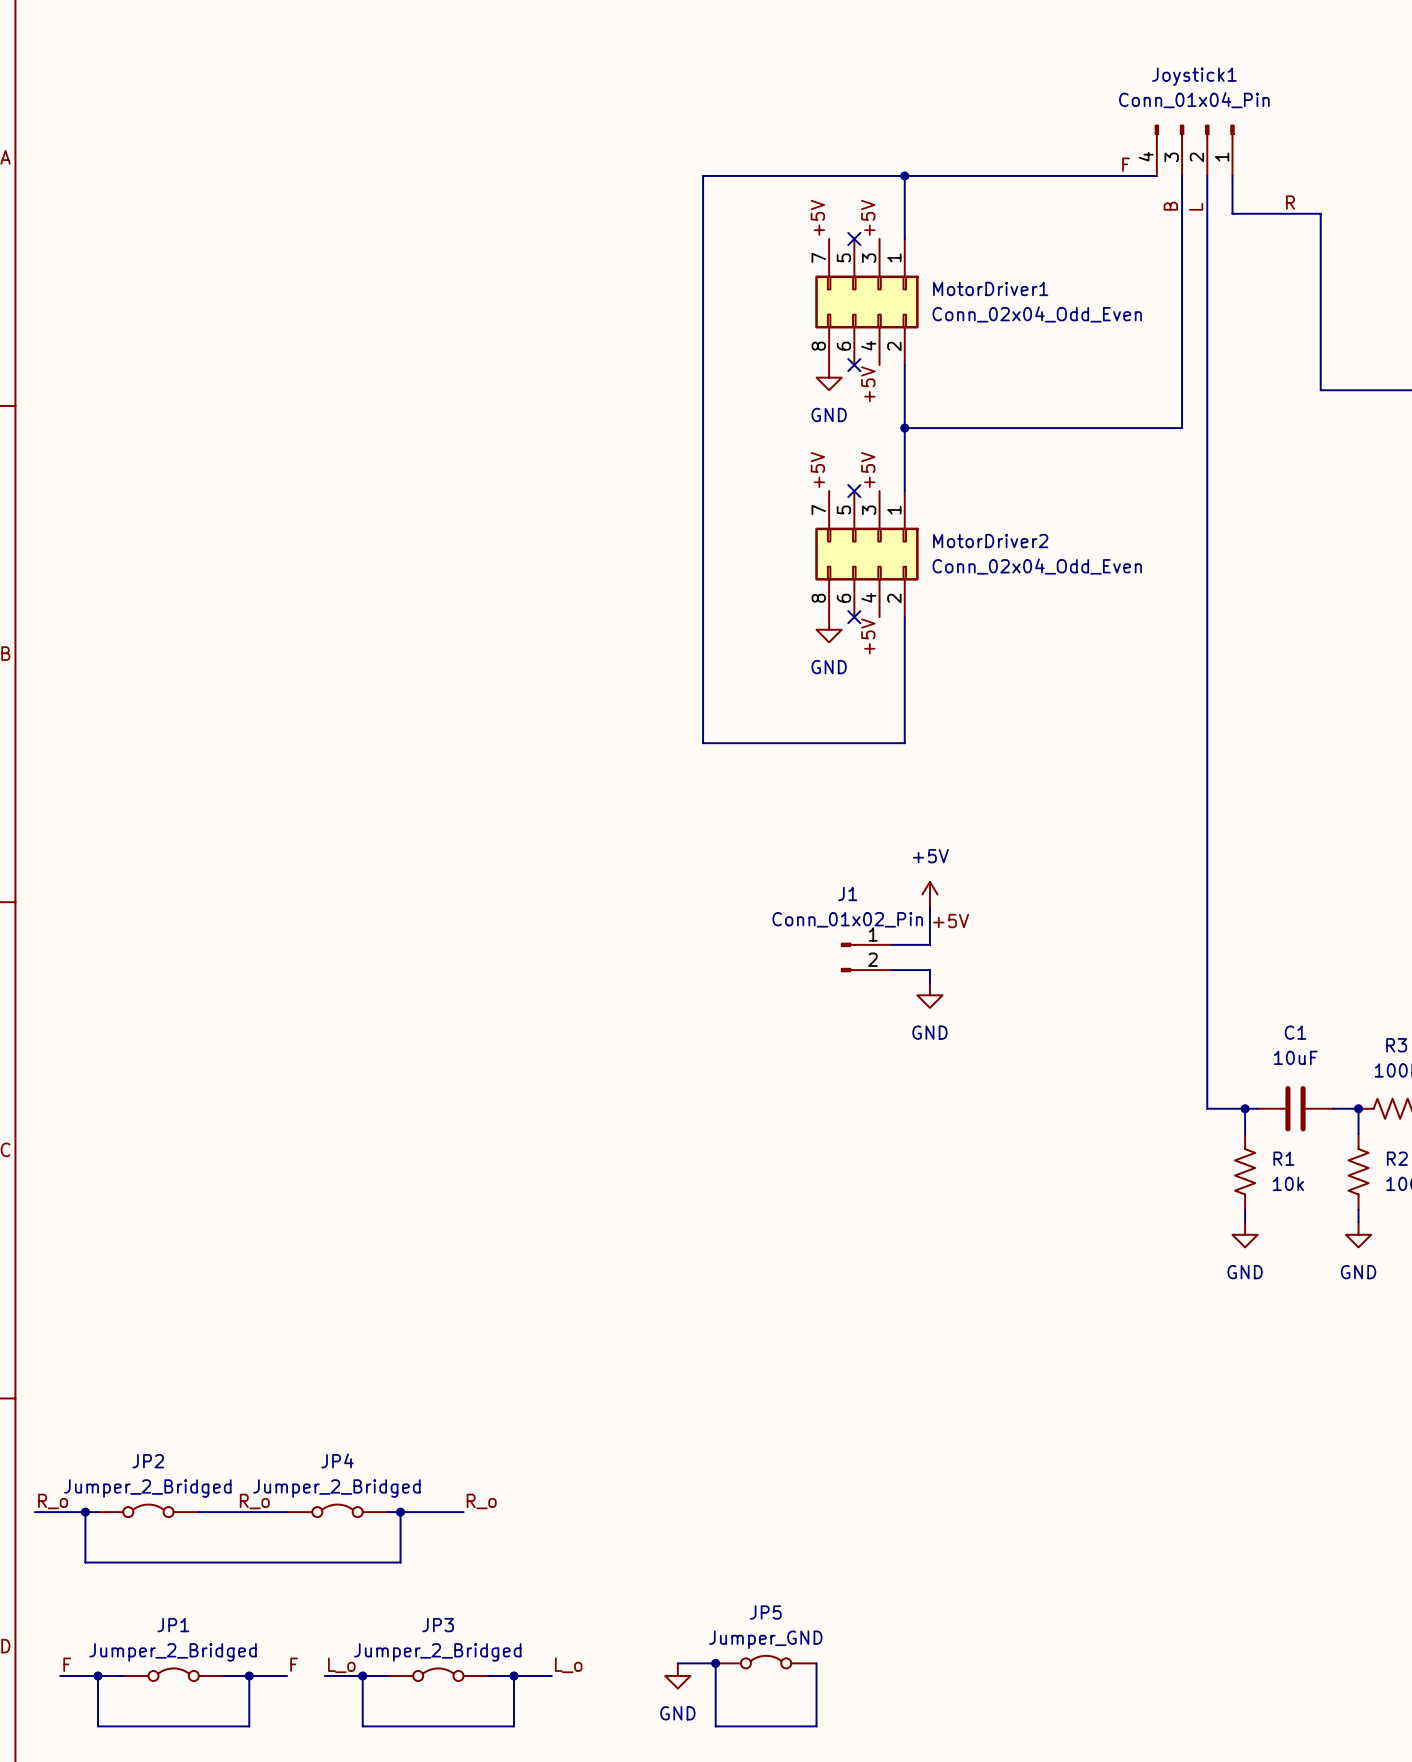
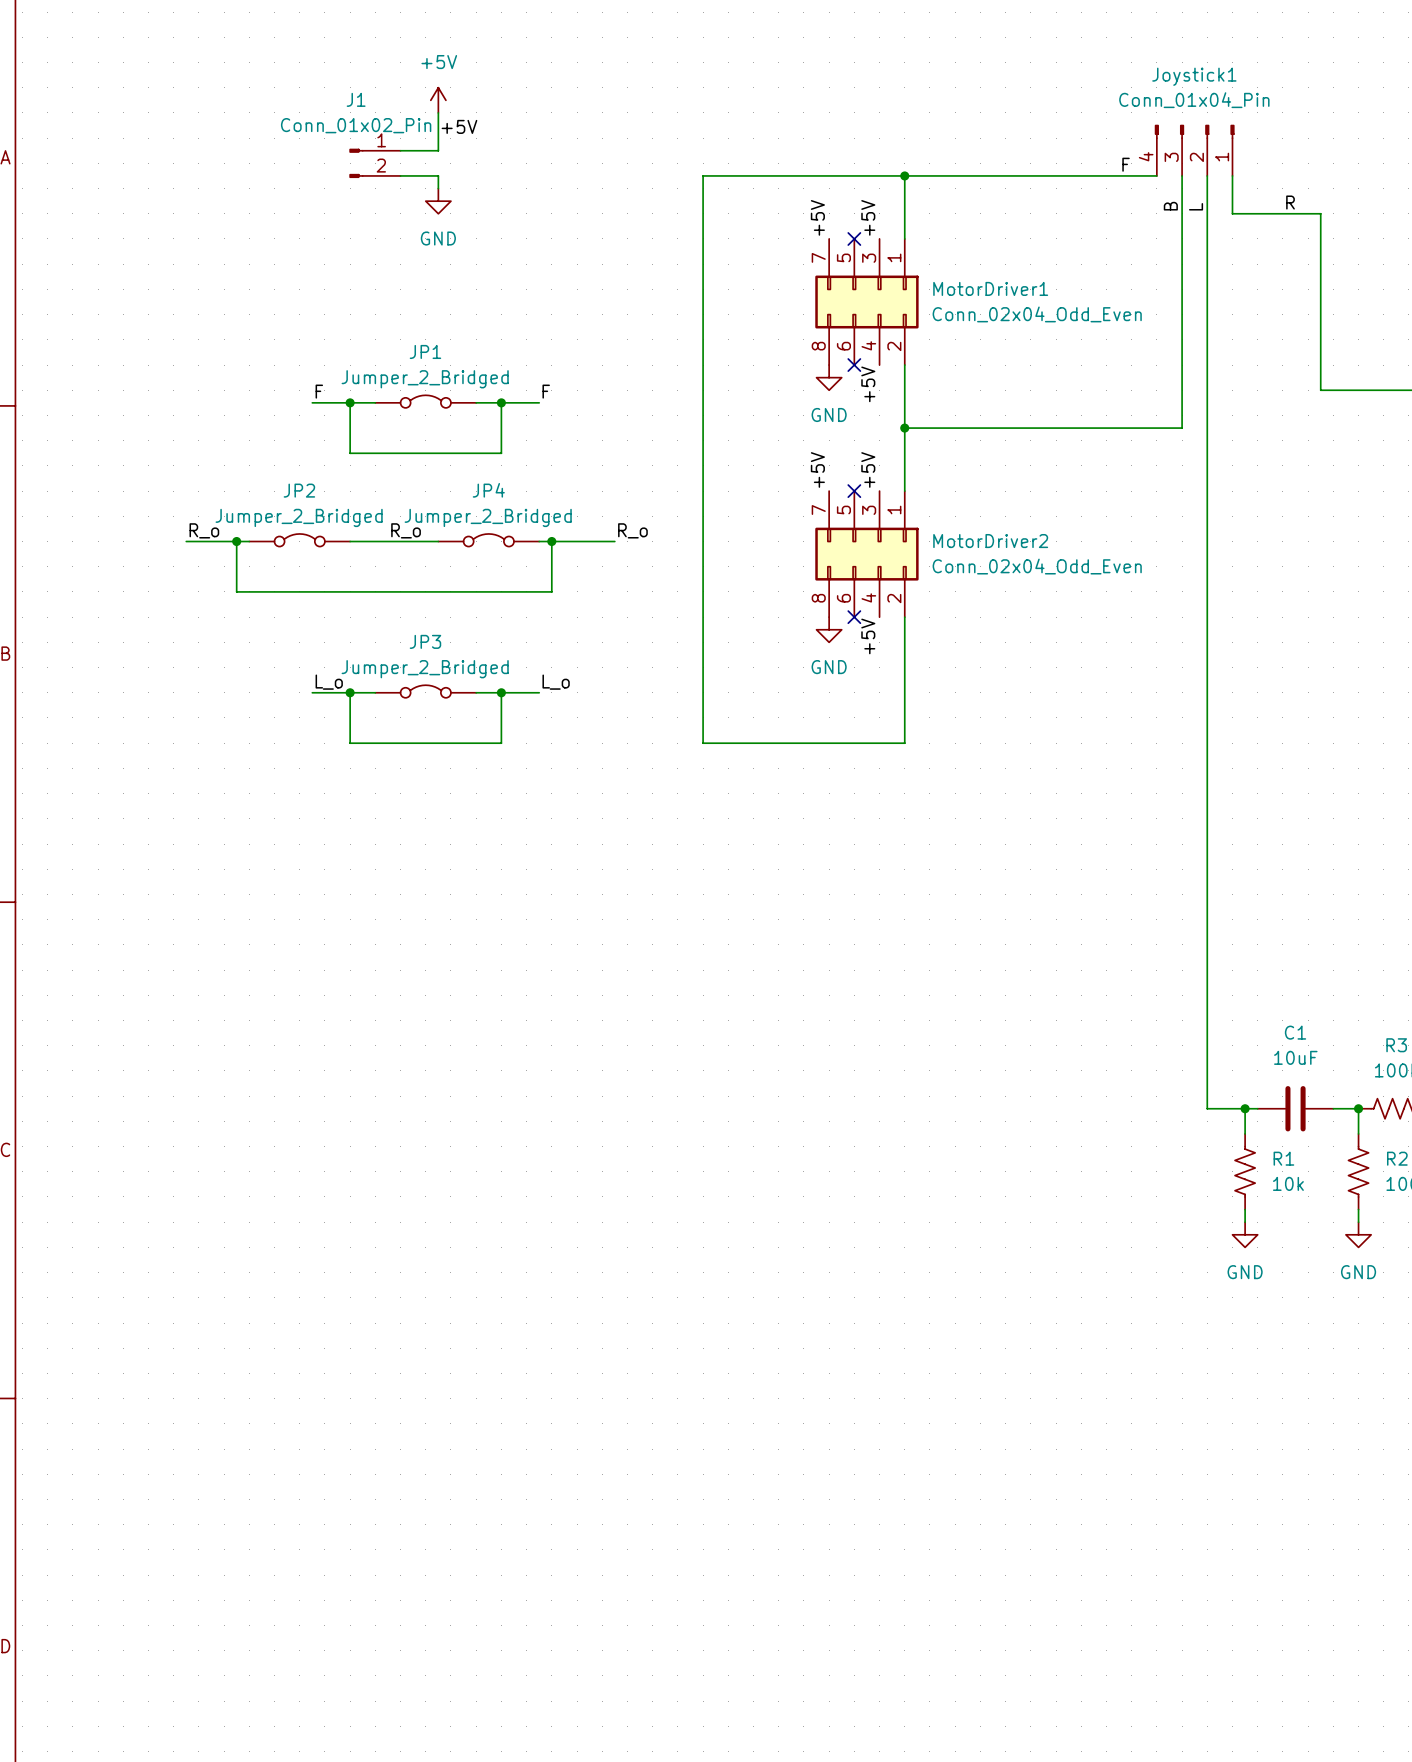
power symbol: none -> +5V (438, 100)
wire: none -> (438, 112) (438, 150) (400, 150)
label: none -> +5V (459, 126)
wire: none -> (400, 175) (438, 175) (438, 188)
power symbol: none -> GND (438, 201)
label: none -> F (319, 391)
label: none -> F (546, 391)
wire: none -> (312, 402) (375, 402)
wire: none -> (350, 402) (350, 453) (501, 453) (501, 402)
junction: none -> (350, 402)
wire: none -> (476, 402) (539, 402)
junction: none -> (501, 402)
label: none -> R_o (204, 530)
label: none -> R_o (406, 530)
label: none -> R_o (632, 530)
wire: none -> (186, 541) (249, 541)
wire: none -> (236, 541) (236, 591) (551, 591) (551, 541)
junction: none -> (236, 541)
wire: none -> (350, 541) (438, 541)
wire: none -> (539, 541) (614, 541)
junction: none -> (551, 541)
label: none -> L_o (329, 682)
label: none -> L_o (556, 682)
wire: none -> (312, 692) (375, 692)
wire: none -> (350, 692) (350, 743) (501, 743) (501, 692)
junction: none -> (350, 692)
wire: none -> (476, 692) (539, 692)
junction: none -> (501, 692)
power symbol: +5V (929, 894) -> none
wire: (929, 907) (929, 944) (892, 944) -> none
label: +5V (951, 921) -> none
J1 position: (866, 957) -> (374, 163)
wire: (892, 970) (929, 970) (929, 982) -> none
power symbol: GND (929, 995) -> none
label: R_o (53, 1501) -> none
label: R_o (254, 1501) -> none
label: R_o (481, 1501) -> none
JP2 position: (148, 1510) -> (299, 540)
JP4 position: (337, 1510) -> (488, 540)
wire: (35, 1512) (98, 1512) -> none
wire: (85, 1512) (85, 1562) (400, 1562) (400, 1512) -> none
junction: (85, 1512) -> none
wire: (198, 1512) (287, 1512) -> none
wire: (387, 1512) (463, 1512) -> none
junction: (400, 1512) -> none
JP5: Jumper_GND (766, 1662) -> none
wire: (677, 1663) (715, 1663) (715, 1726) (816, 1726) (816, 1663) -> none
junction: (715, 1663) -> none
label: F (67, 1664) -> none
label: F (294, 1664) -> none
label: L_o (341, 1665) -> none
label: L_o (568, 1665) -> none
JP1 position: (173, 1674) -> (425, 401)
JP3 position: (438, 1674) -> (425, 691)
wire: (60, 1675) (123, 1675) -> none
wire: (98, 1675) (98, 1726) (249, 1726) (249, 1675) -> none
junction: (98, 1675) -> none
wire: (224, 1675) (287, 1675) -> none
junction: (249, 1675) -> none
wire: (324, 1675) (387, 1675) -> none
wire: (362, 1675) (362, 1726) (513, 1726) (513, 1675) -> none
junction: (362, 1675) -> none
wire: (488, 1675) (551, 1675) -> none
junction: (513, 1675) -> none
power symbol: GND (677, 1675) -> none

